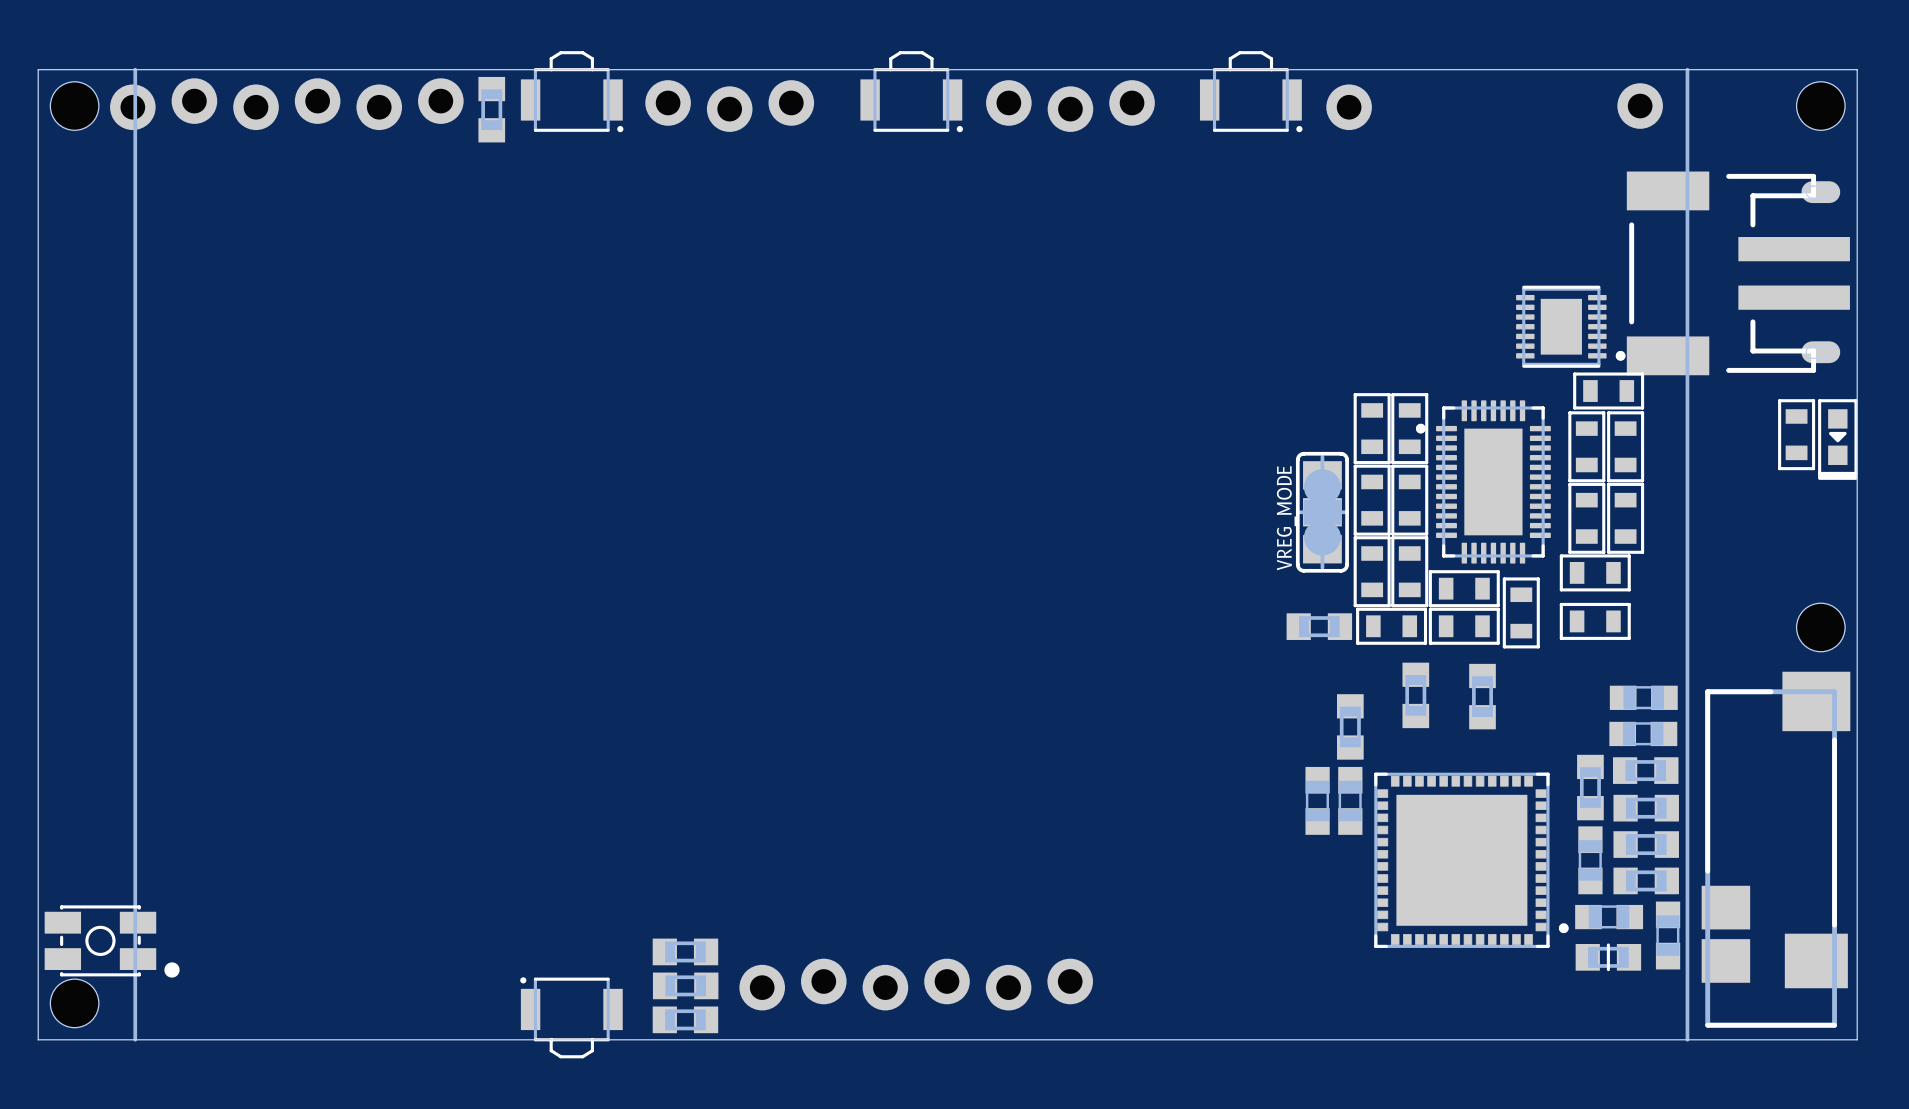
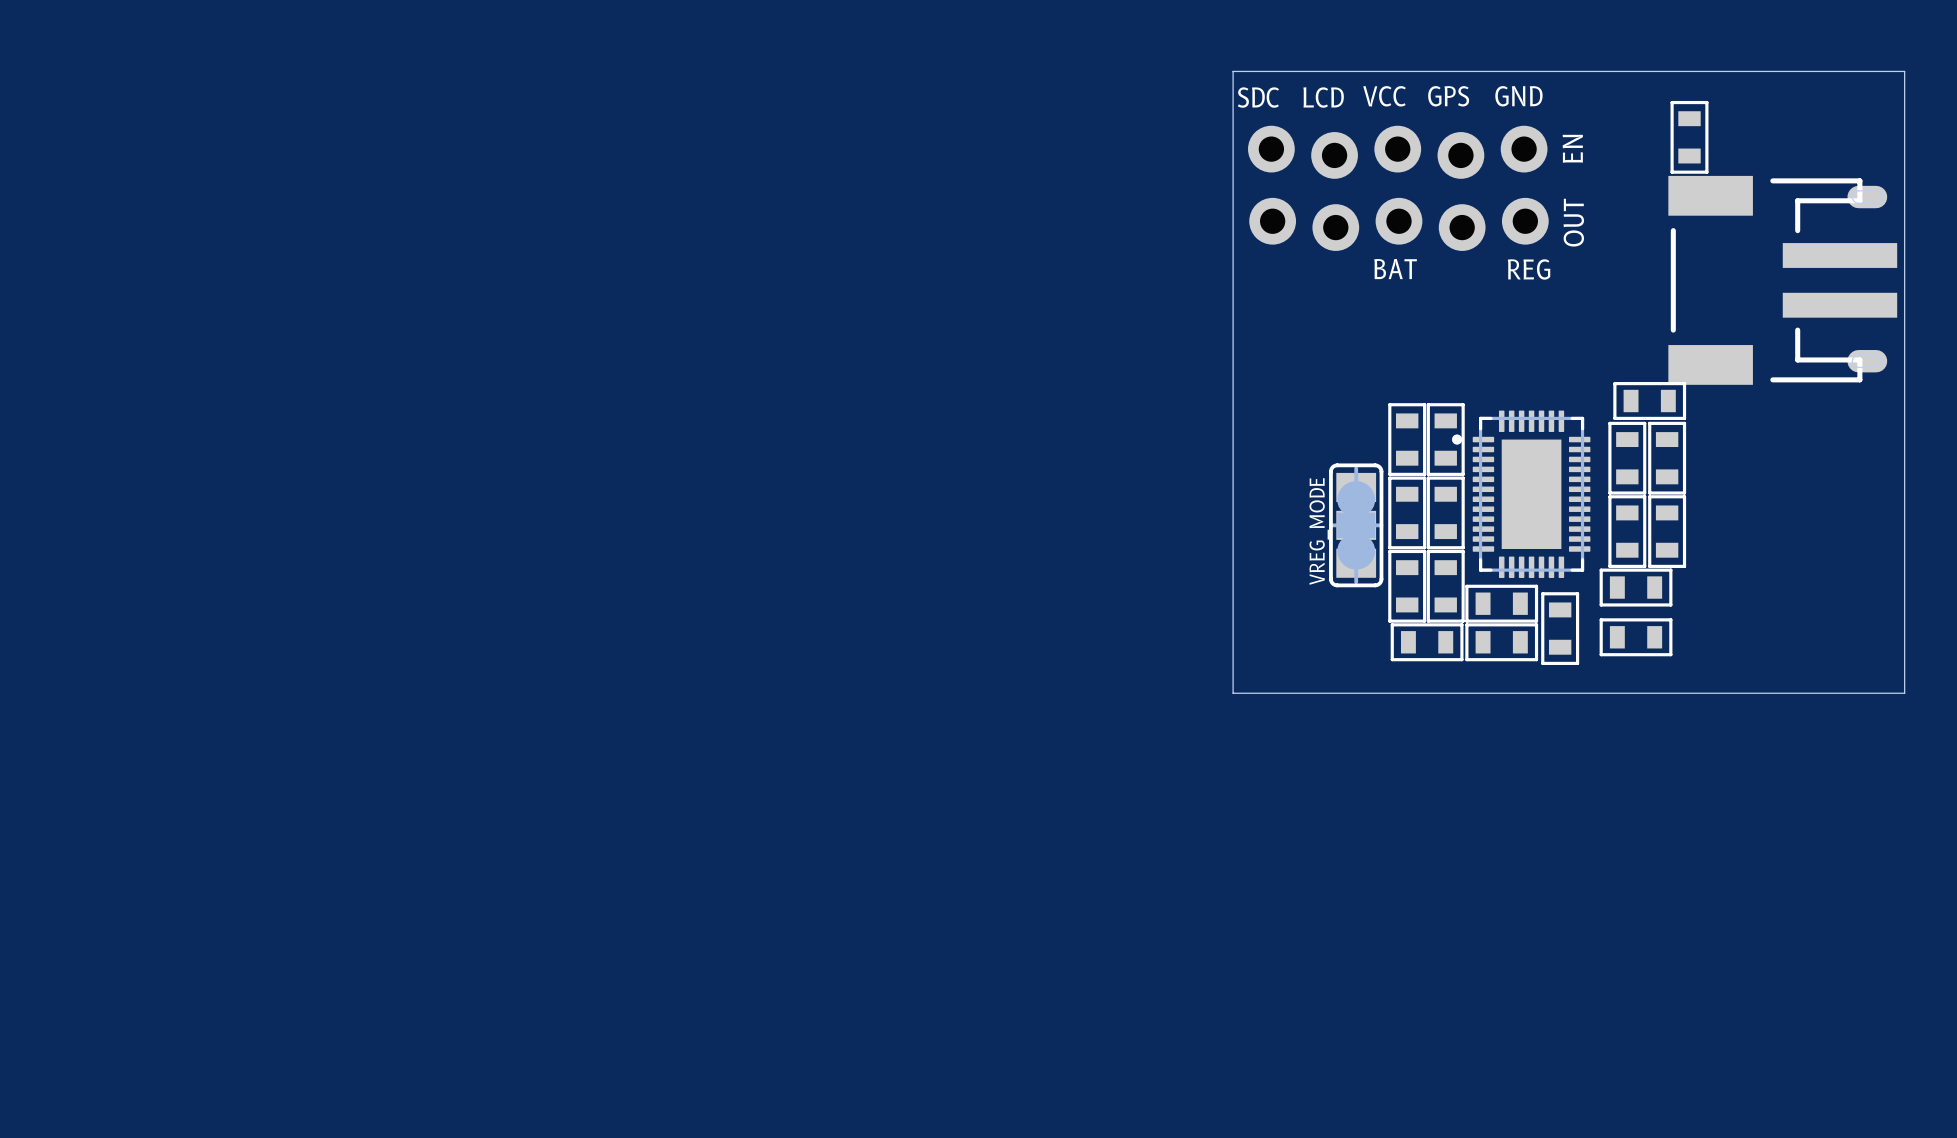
line: (135, 69) (135, 1039) -> none
board edge: (1202, 69) (38, 69) (38, 1039) (1857, 1039) (1857, 675) -> (1233, 71) (1233, 693) (1904, 693)
line: (1687, 69) (1687, 1039) -> none
part: (572, 91) -> none
part: (911, 91) -> none
part: (1251, 91) -> none
text: none -> VCC (1384, 96)
text: none -> GPS (1448, 96)
text: none -> GND (1518, 96)
text: none -> SDC (1258, 97)
text: none -> LCD (1323, 97)
part: (286, 104) -> none
hole: (74, 106) -> none
part: (729, 106) -> none
part: (1070, 106) -> none
part: (1640, 106) -> none
hole: (1820, 106) -> none
part: (1349, 107) -> none
part: (491, 109) -> none
text: none -> EN (1572, 148)
part: none -> (1397, 152)
text: none -> OUT (1573, 222)
part: none -> (1398, 224)
text: none -> BAT (1395, 269)
text: none -> REG (1529, 269)
part: (1570, 326) -> none
part position: (1796, 434) -> (1689, 137)
part: (1837, 439) -> none
part: (1319, 626) -> none
hole: (1820, 627) -> none
part: (1415, 695) -> none
part: (1482, 696) -> none
part: (1643, 697) -> none
part: (1350, 726) -> none
part: (1643, 733) -> none
part: (1645, 770) -> none
part: (1590, 787) -> none
part: (1317, 800) -> none
part: (1350, 800) -> none
part: (1646, 808) -> none
part: (1646, 844) -> none
part: (1775, 849) -> none
part: (1471, 860) -> none
part: (1590, 860) -> none
part: (1646, 880) -> none
part: (1609, 917) -> none
part: (1668, 935) -> none
part: (112, 941) -> none
part: (685, 951) -> none
part: (1608, 957) -> none
part: (916, 984) -> none
part: (685, 985) -> none
hole: (74, 1003) -> none
part: (571, 1017) -> none
part: (685, 1019) -> none

